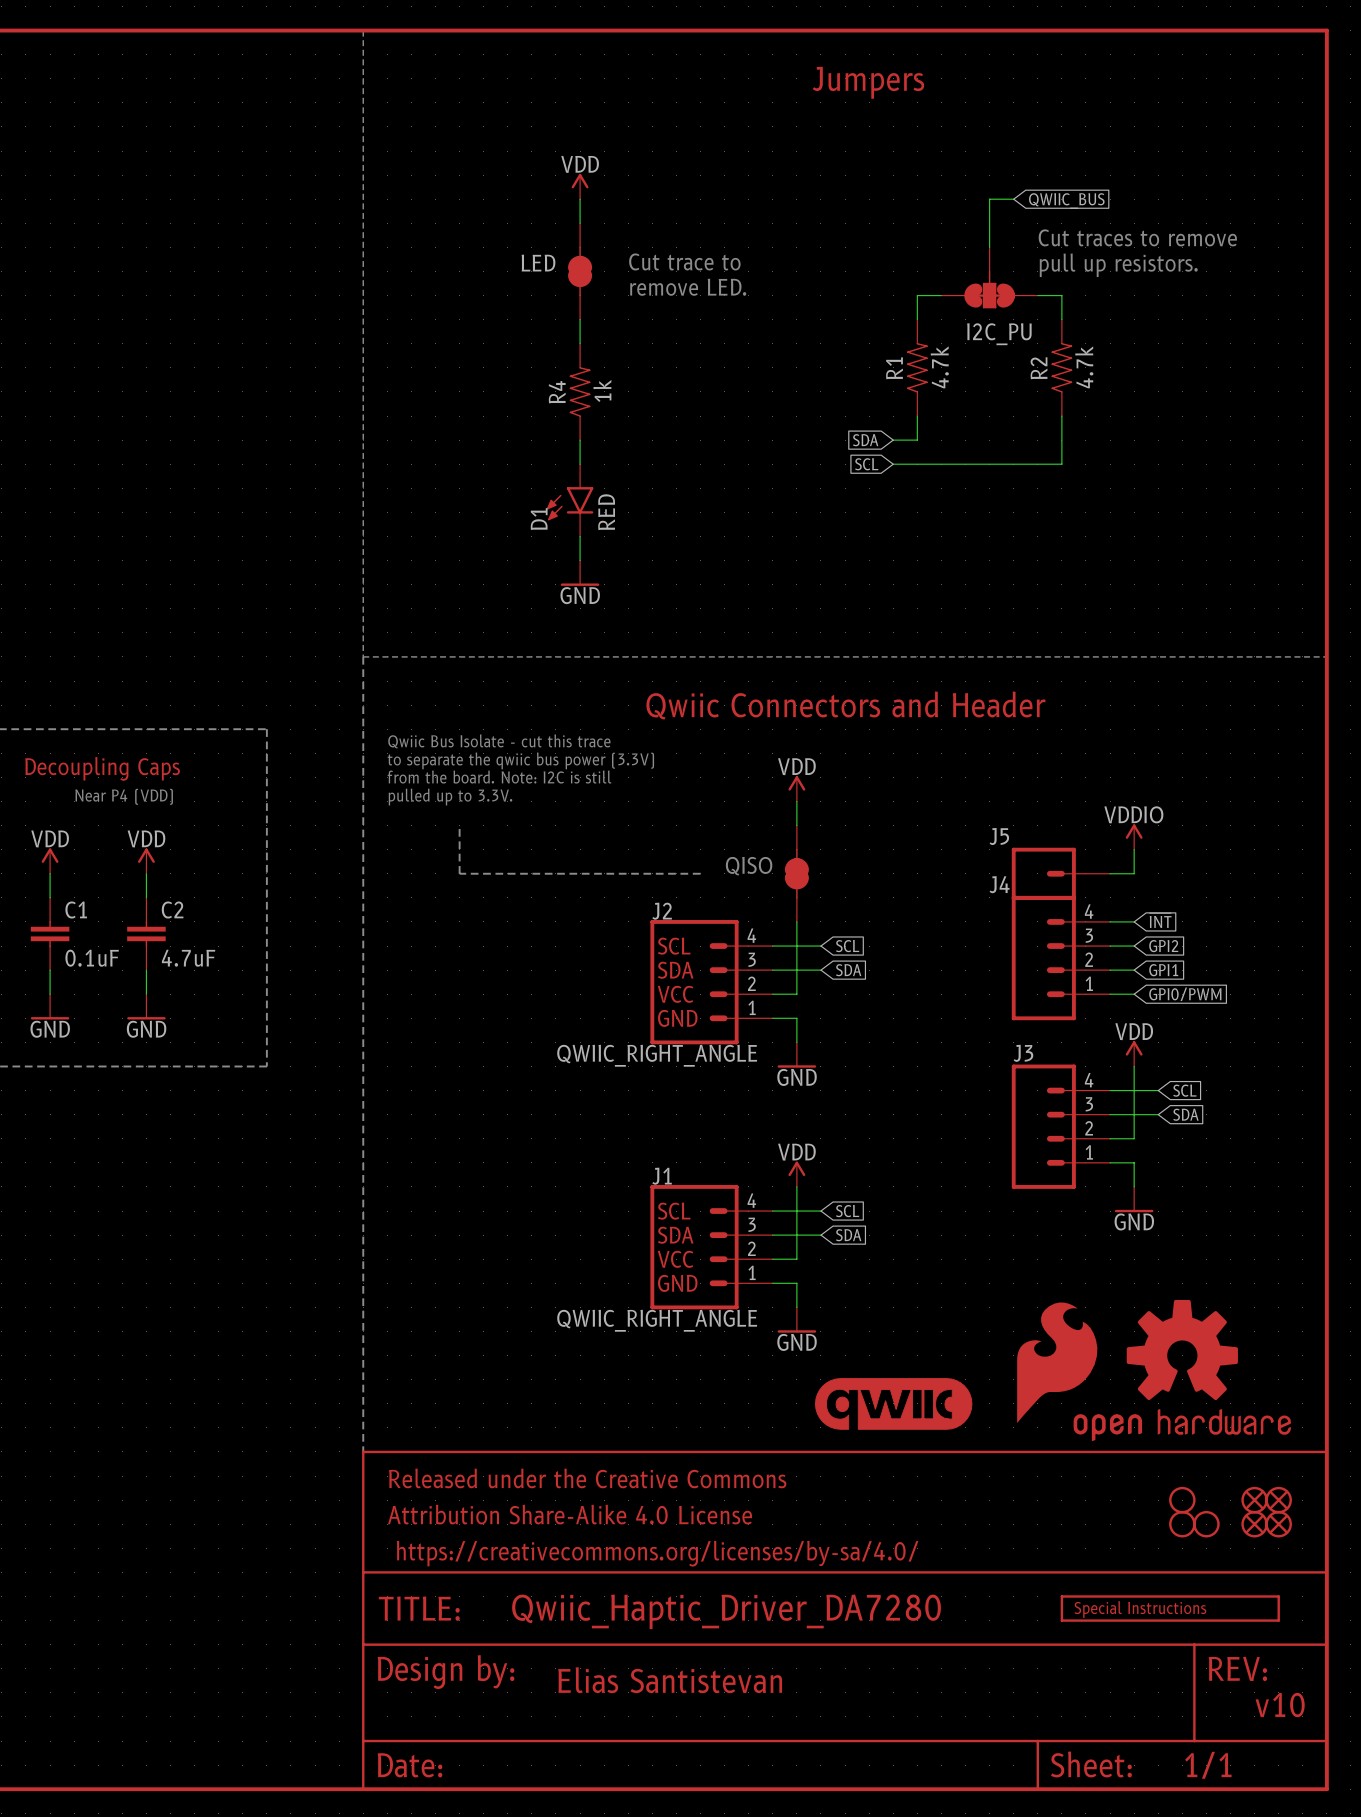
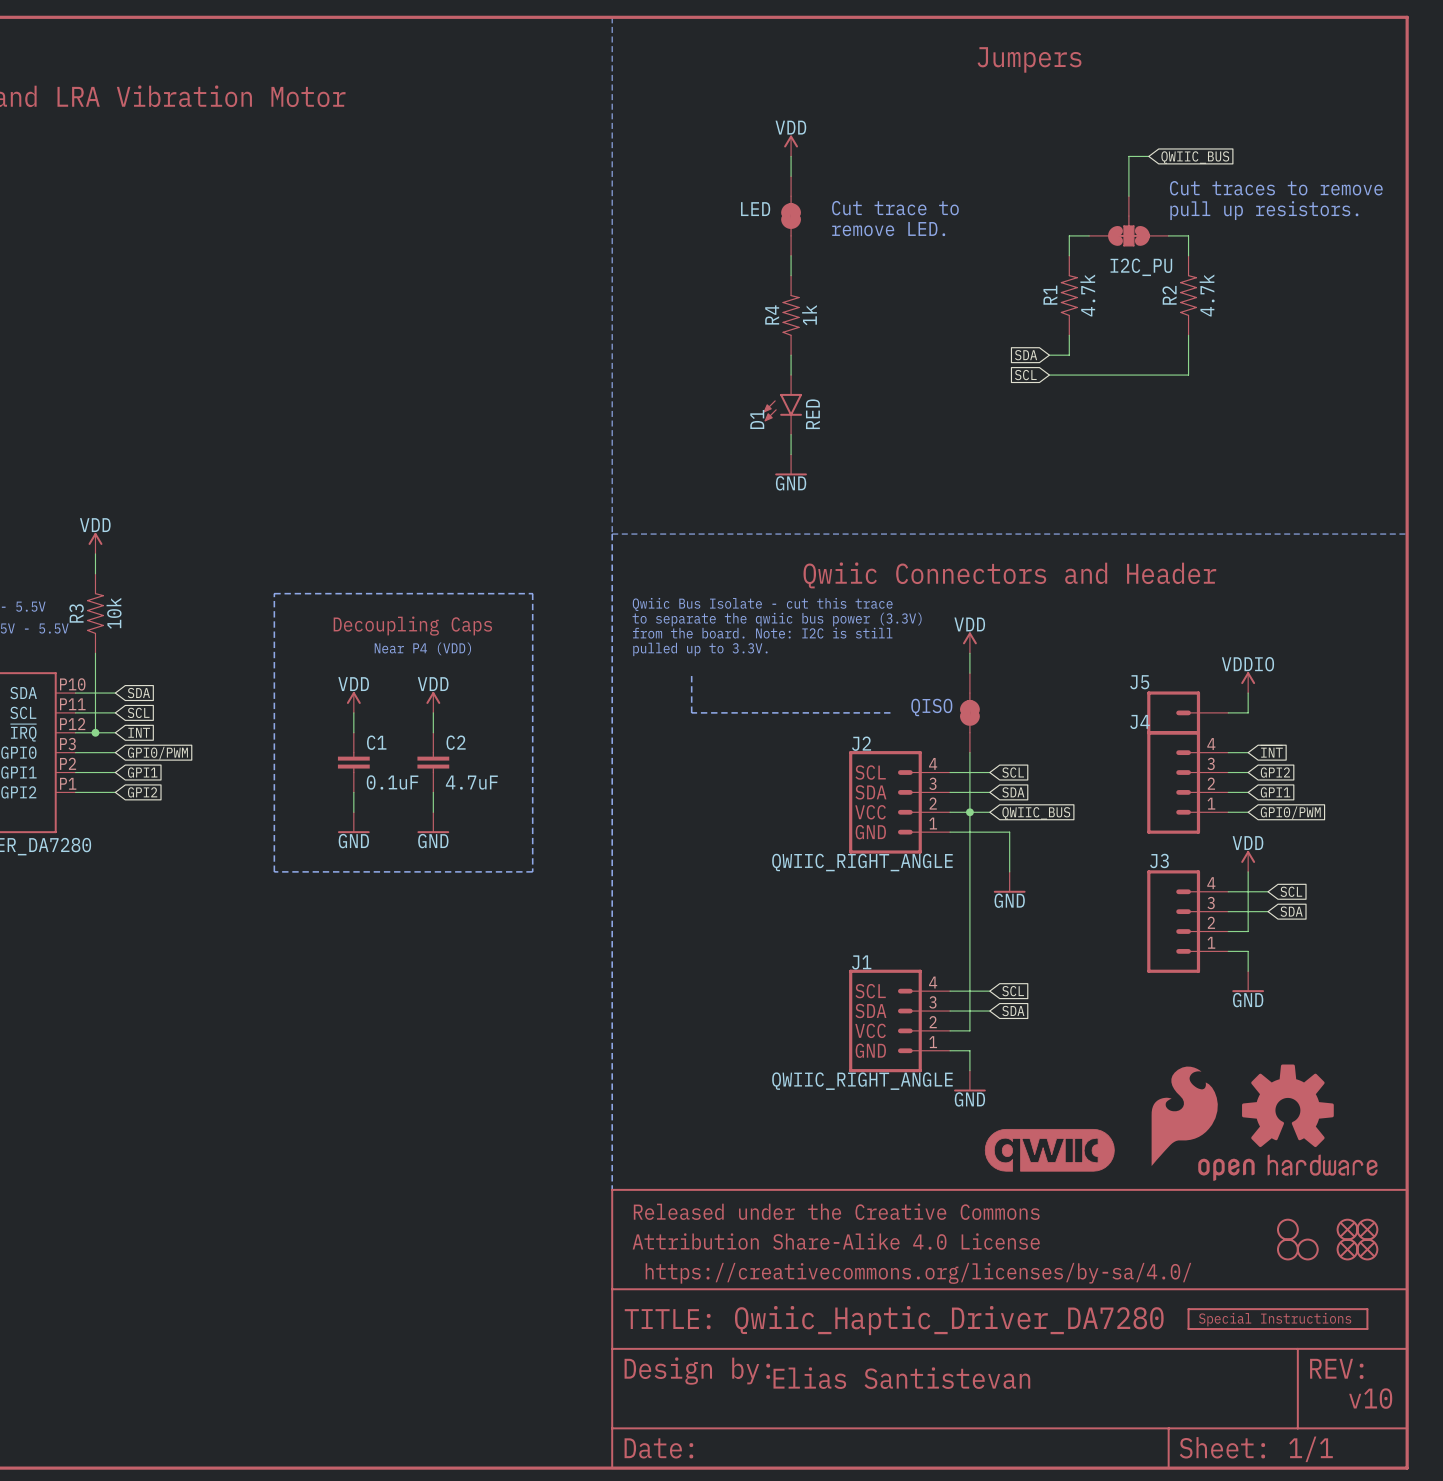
junction: none -> (969, 812)
wire: none -> (989, 812) (969, 812) (969, 832) (1009, 832) (1009, 871)
global label: none -> QWIIC_BUS (1036, 813)
wire: none -> (969, 852) (969, 971)
power symbol position: GND (796, 1055) -> GND (1009, 882)
power symbol: VDD (796, 1174) -> none

